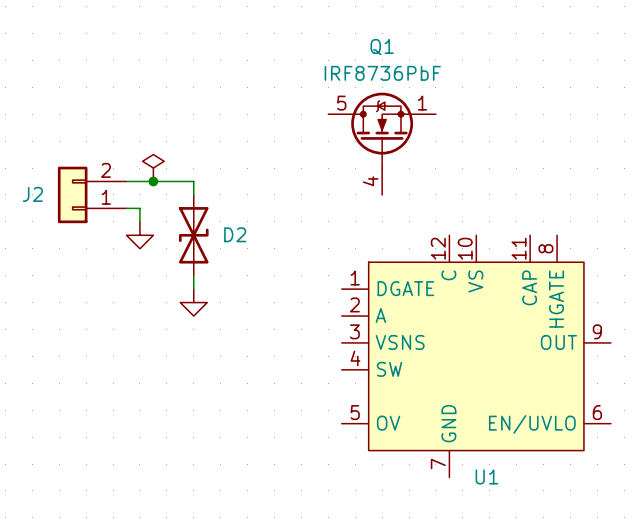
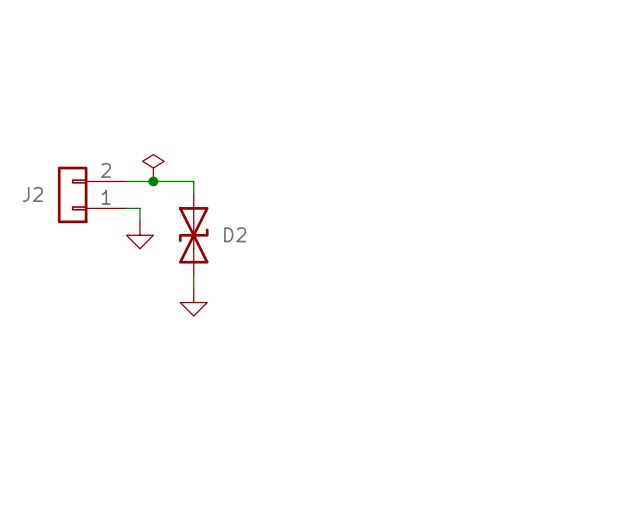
Q1: IRF8736PbF (382, 143) -> none
U1: (476, 356) -> none

